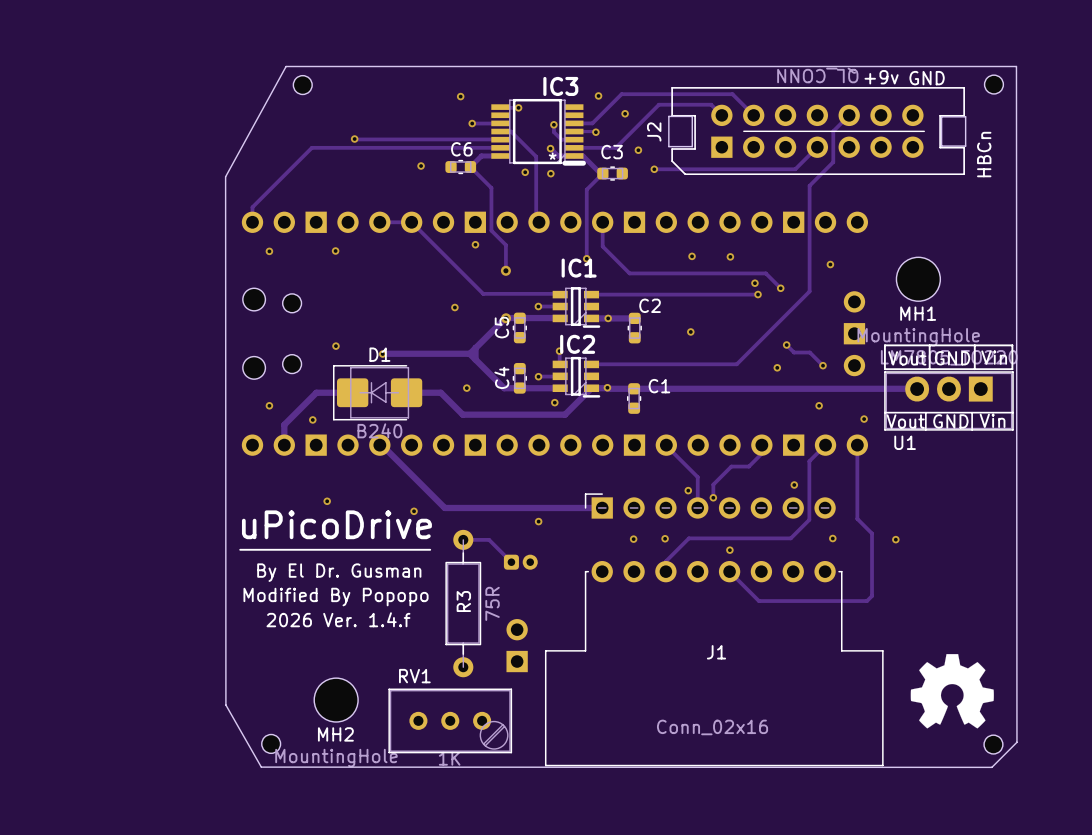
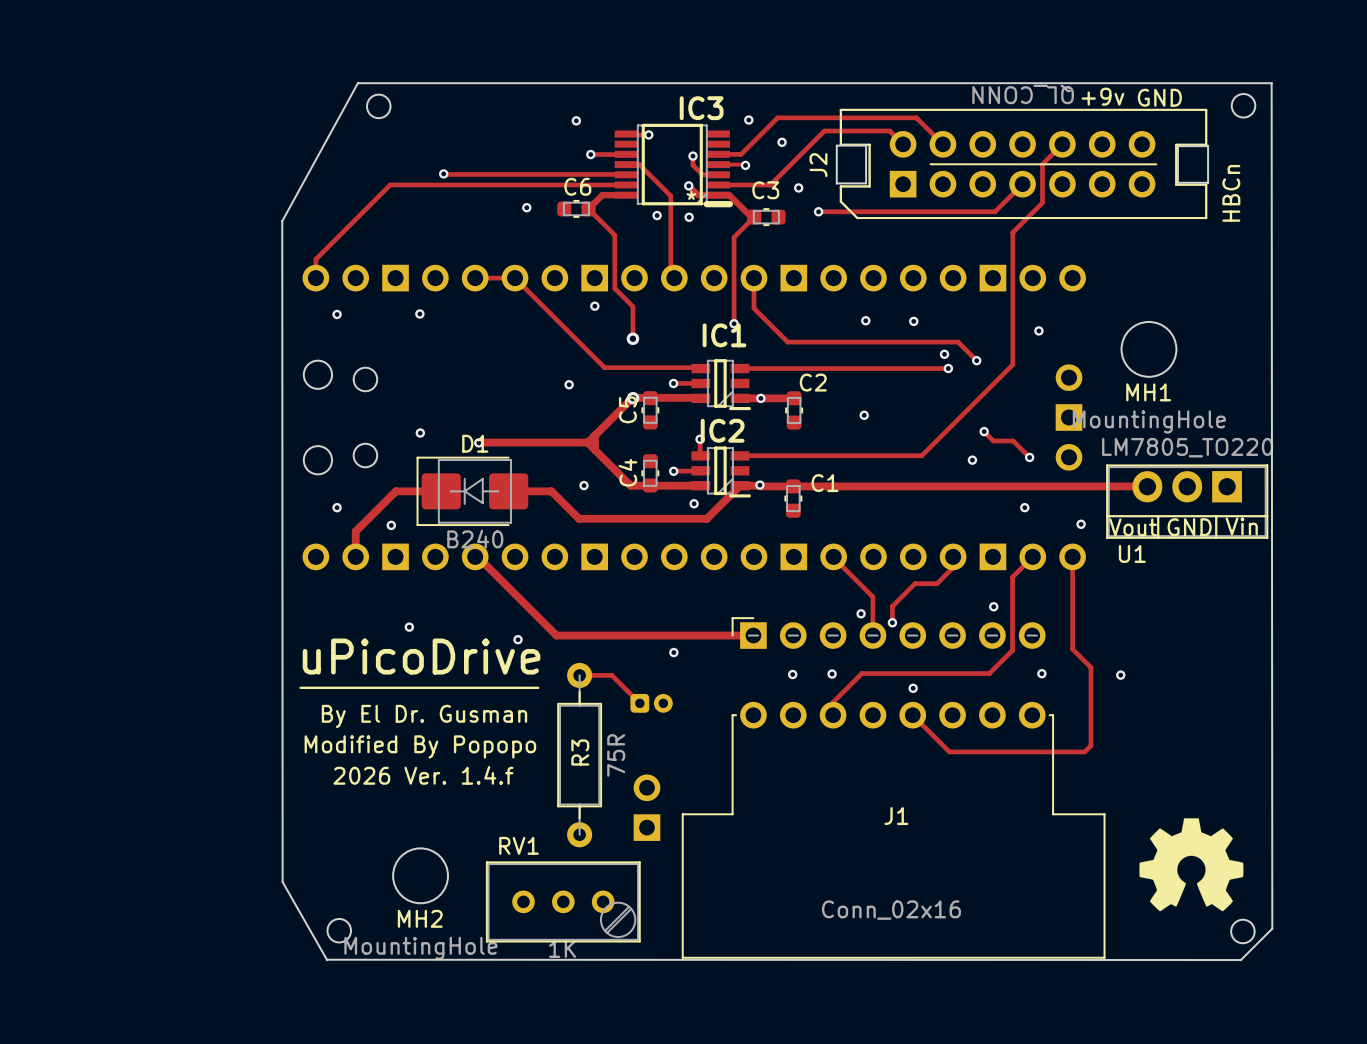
line: (884, 345) (884, 369) (1012, 369) (1012, 345) (884, 345) -> none
line: (929, 345) (929, 369) -> none
line: (974, 345) (974, 369) -> none
text: Vin (994, 357) -> none
text: Vout (907, 358) -> none
text: GND (952, 358) -> none

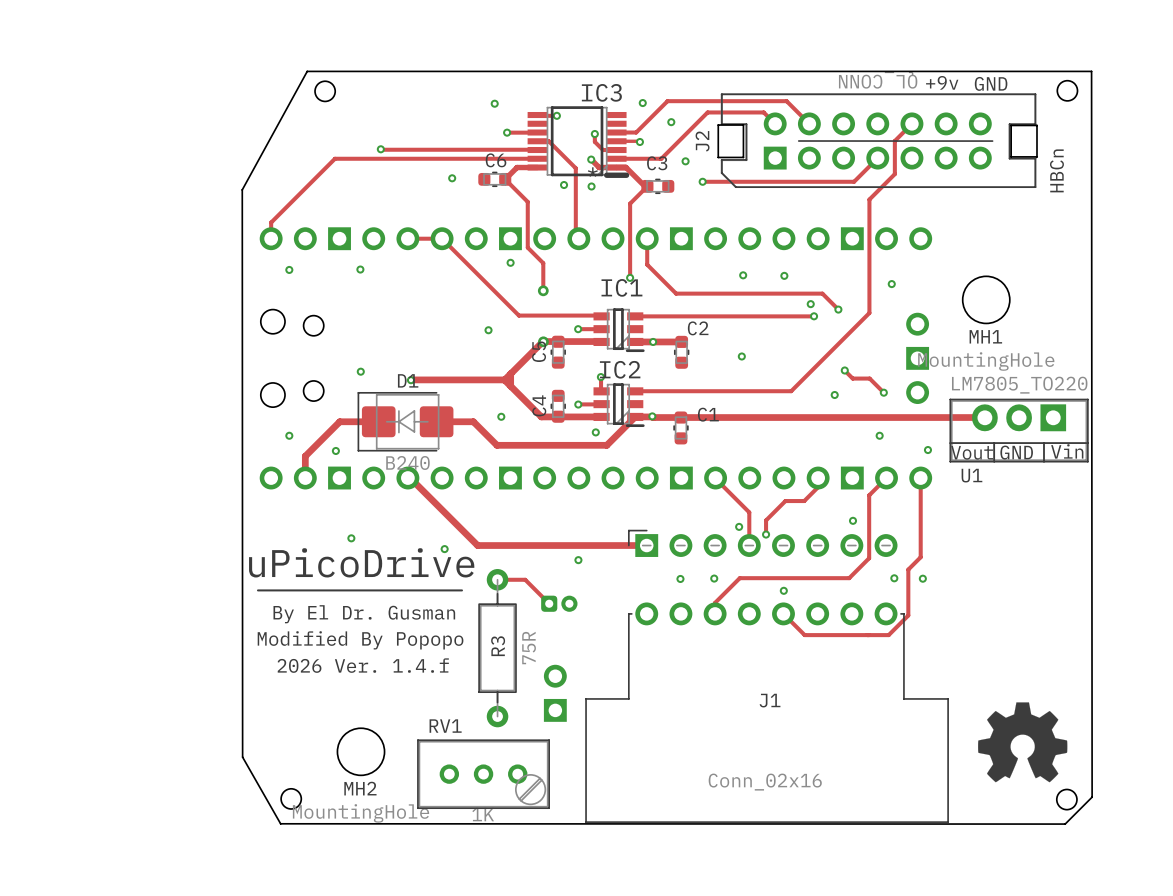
track: (1072, 649) (1090, 667) (1090, 745) (1084, 751) (949, 751) (937, 739) -> (920, 557) (908, 569) (908, 615) (888, 635) (804, 635)
via position: (1120, 675) -> (922, 578)

